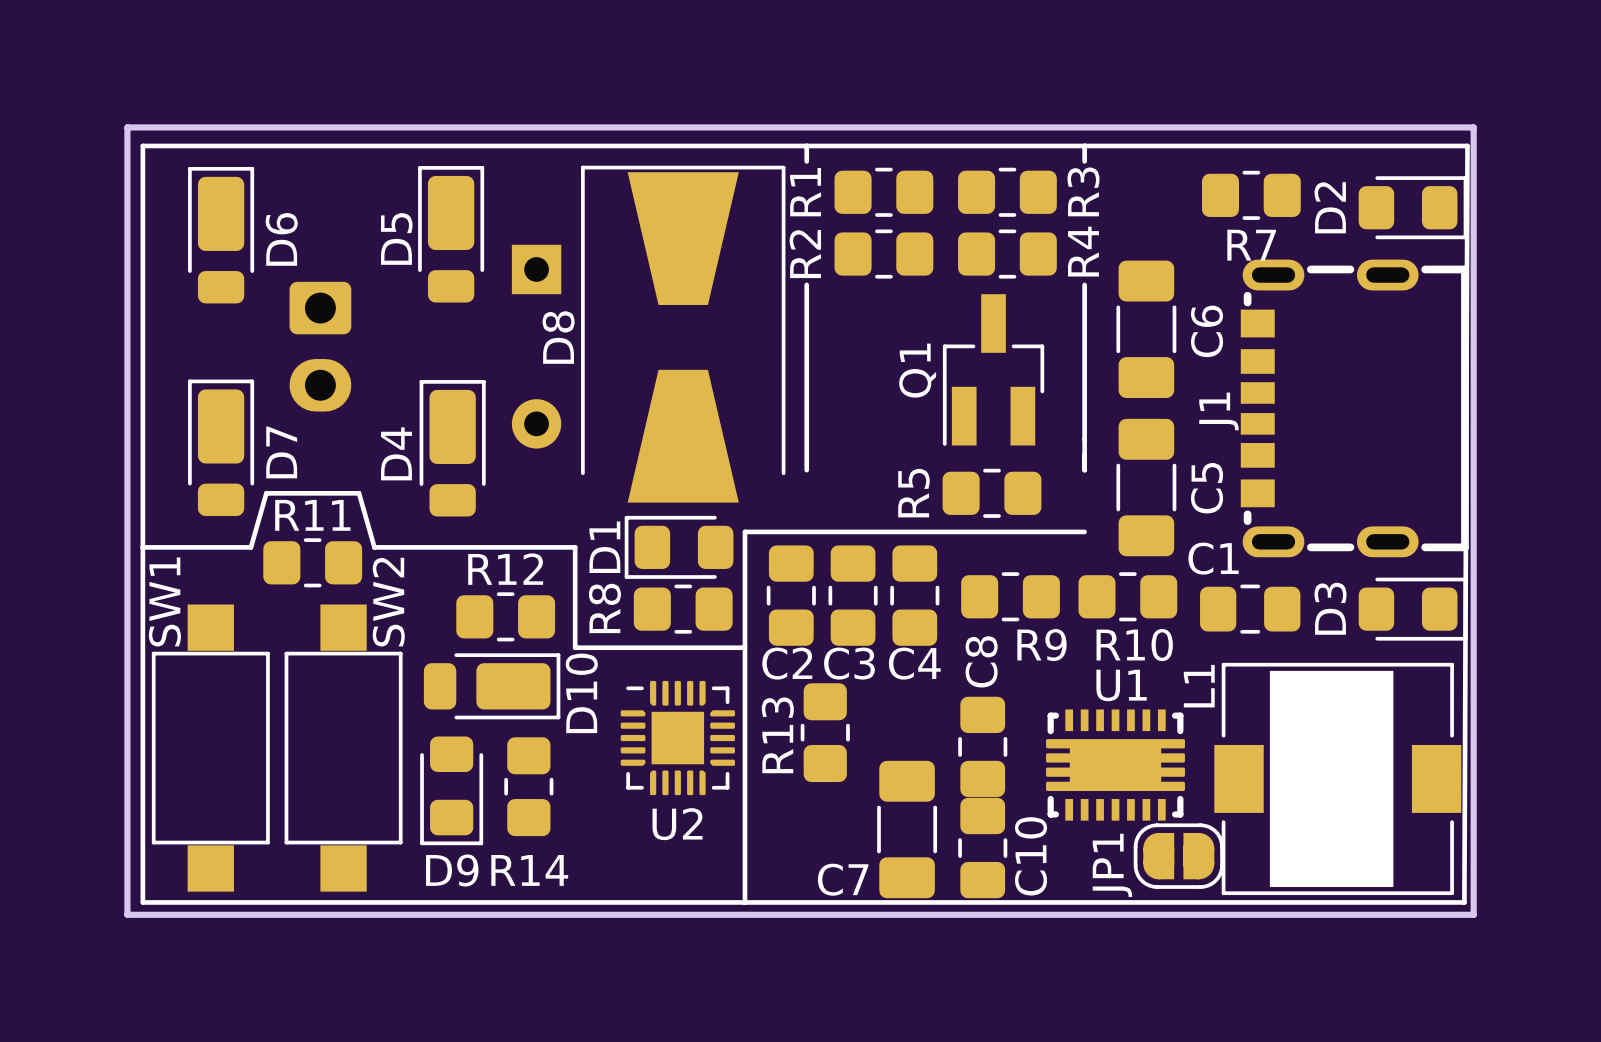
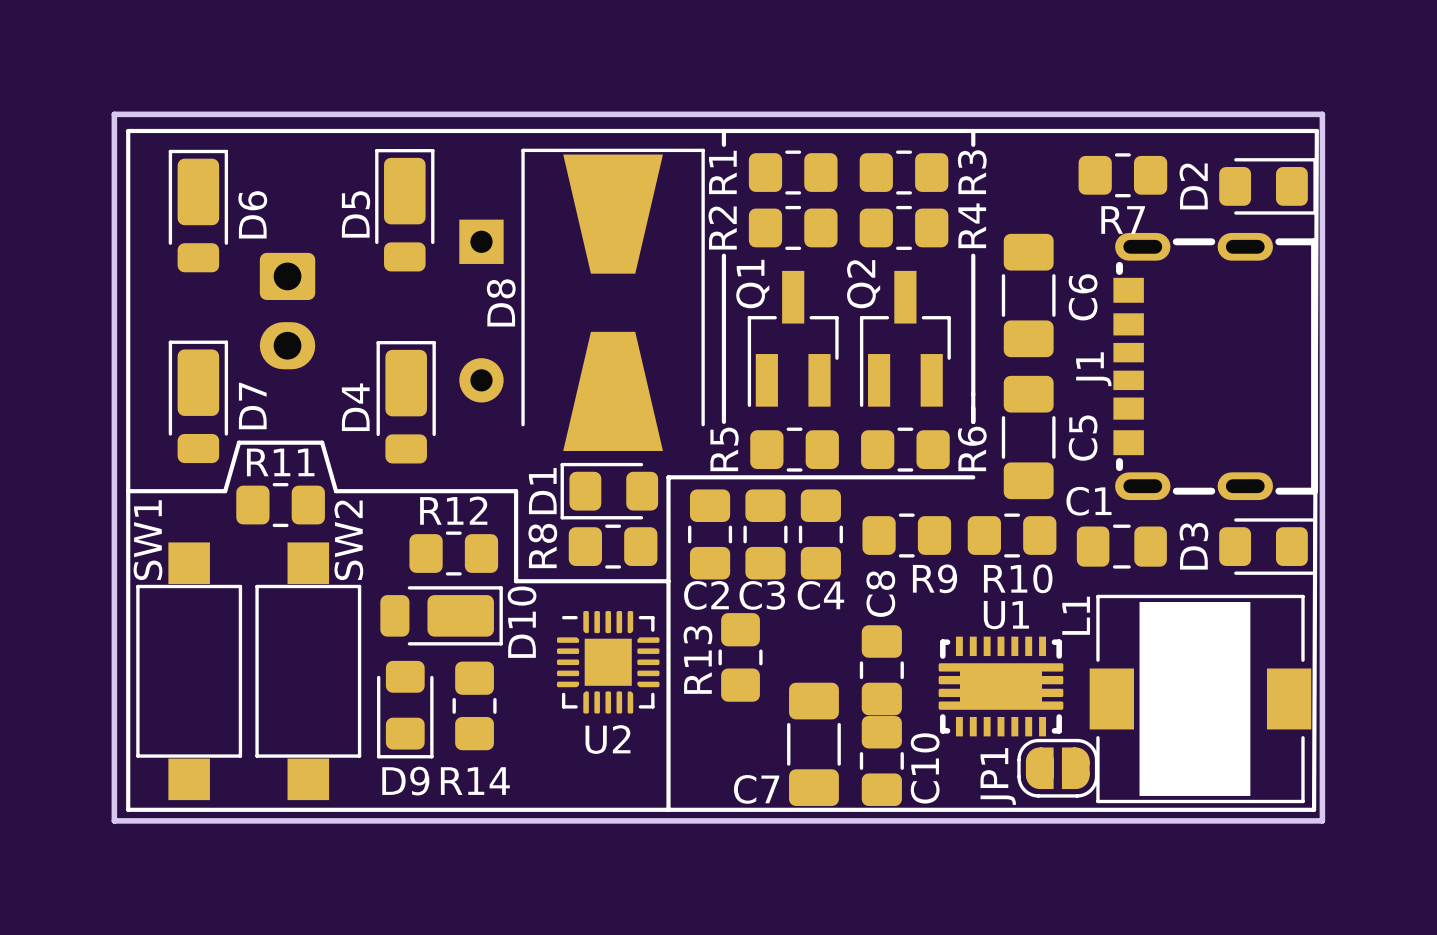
Q1 position: (993, 369) -> (793, 338)
Q1 name position: Q1 (917, 370) -> Q1 (752, 284)
Q2: none -> (905, 338)
R5 position: (992, 493) -> (794, 449)
R6: none -> (905, 449)

